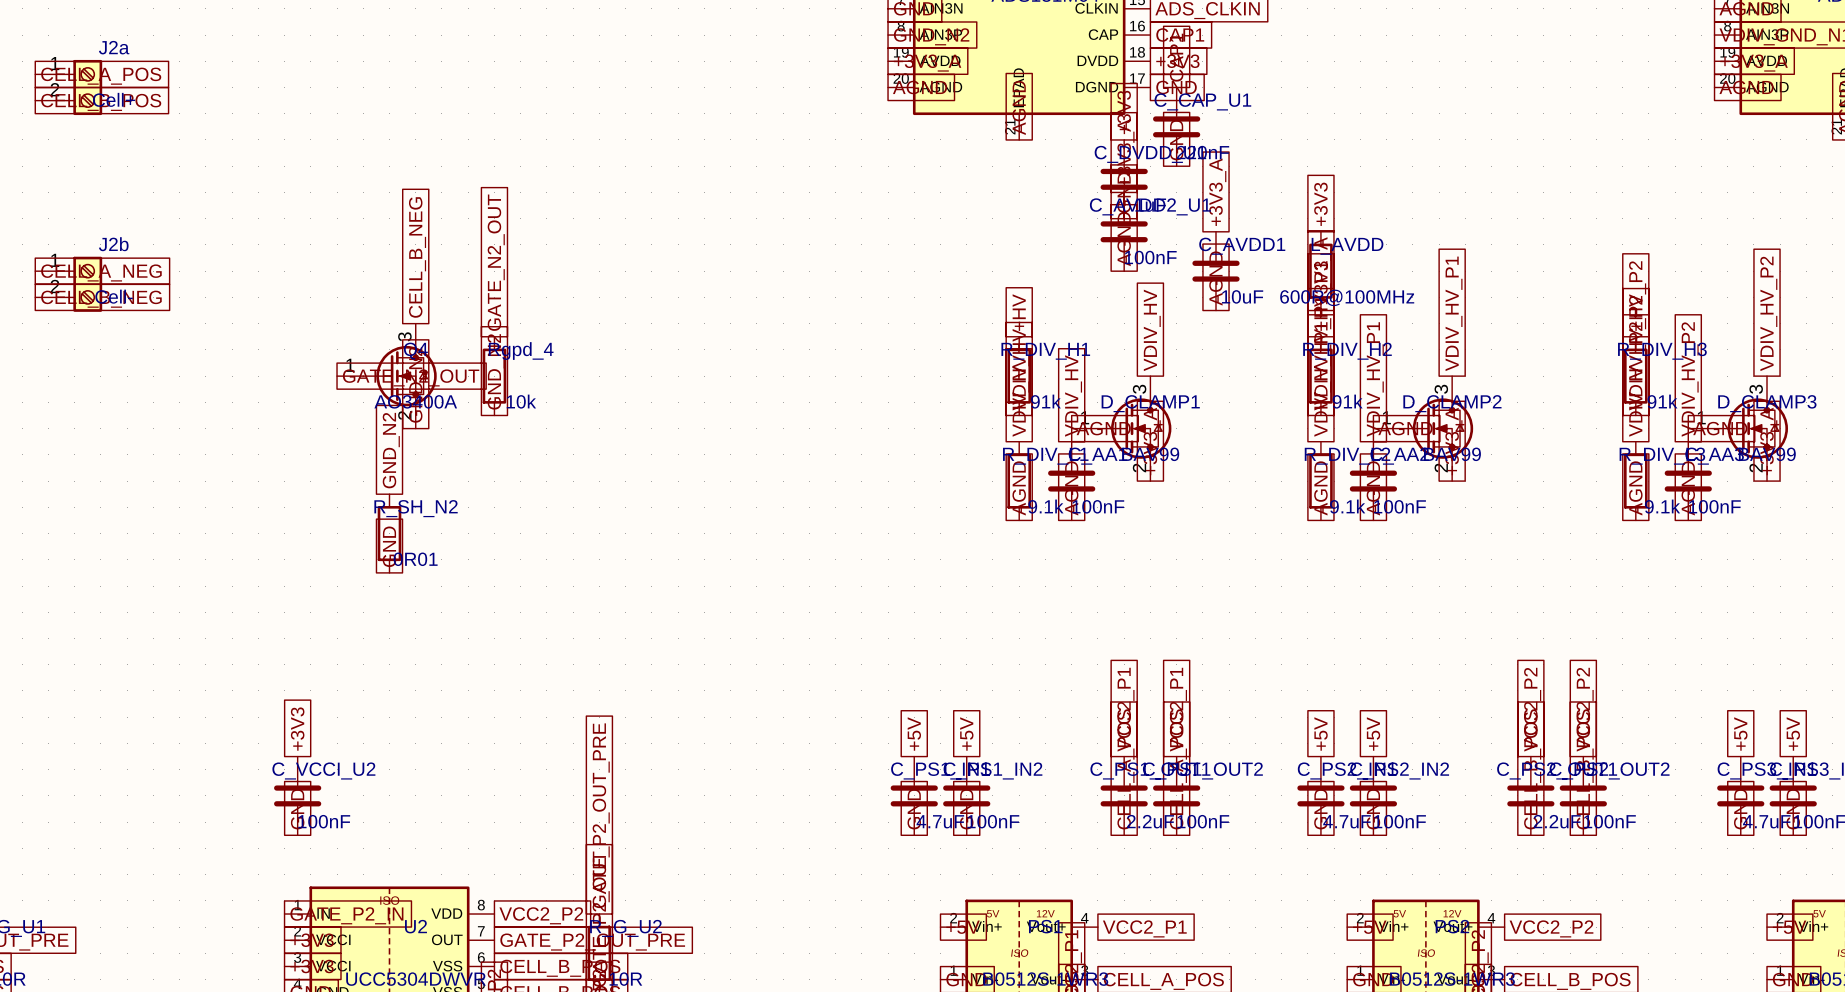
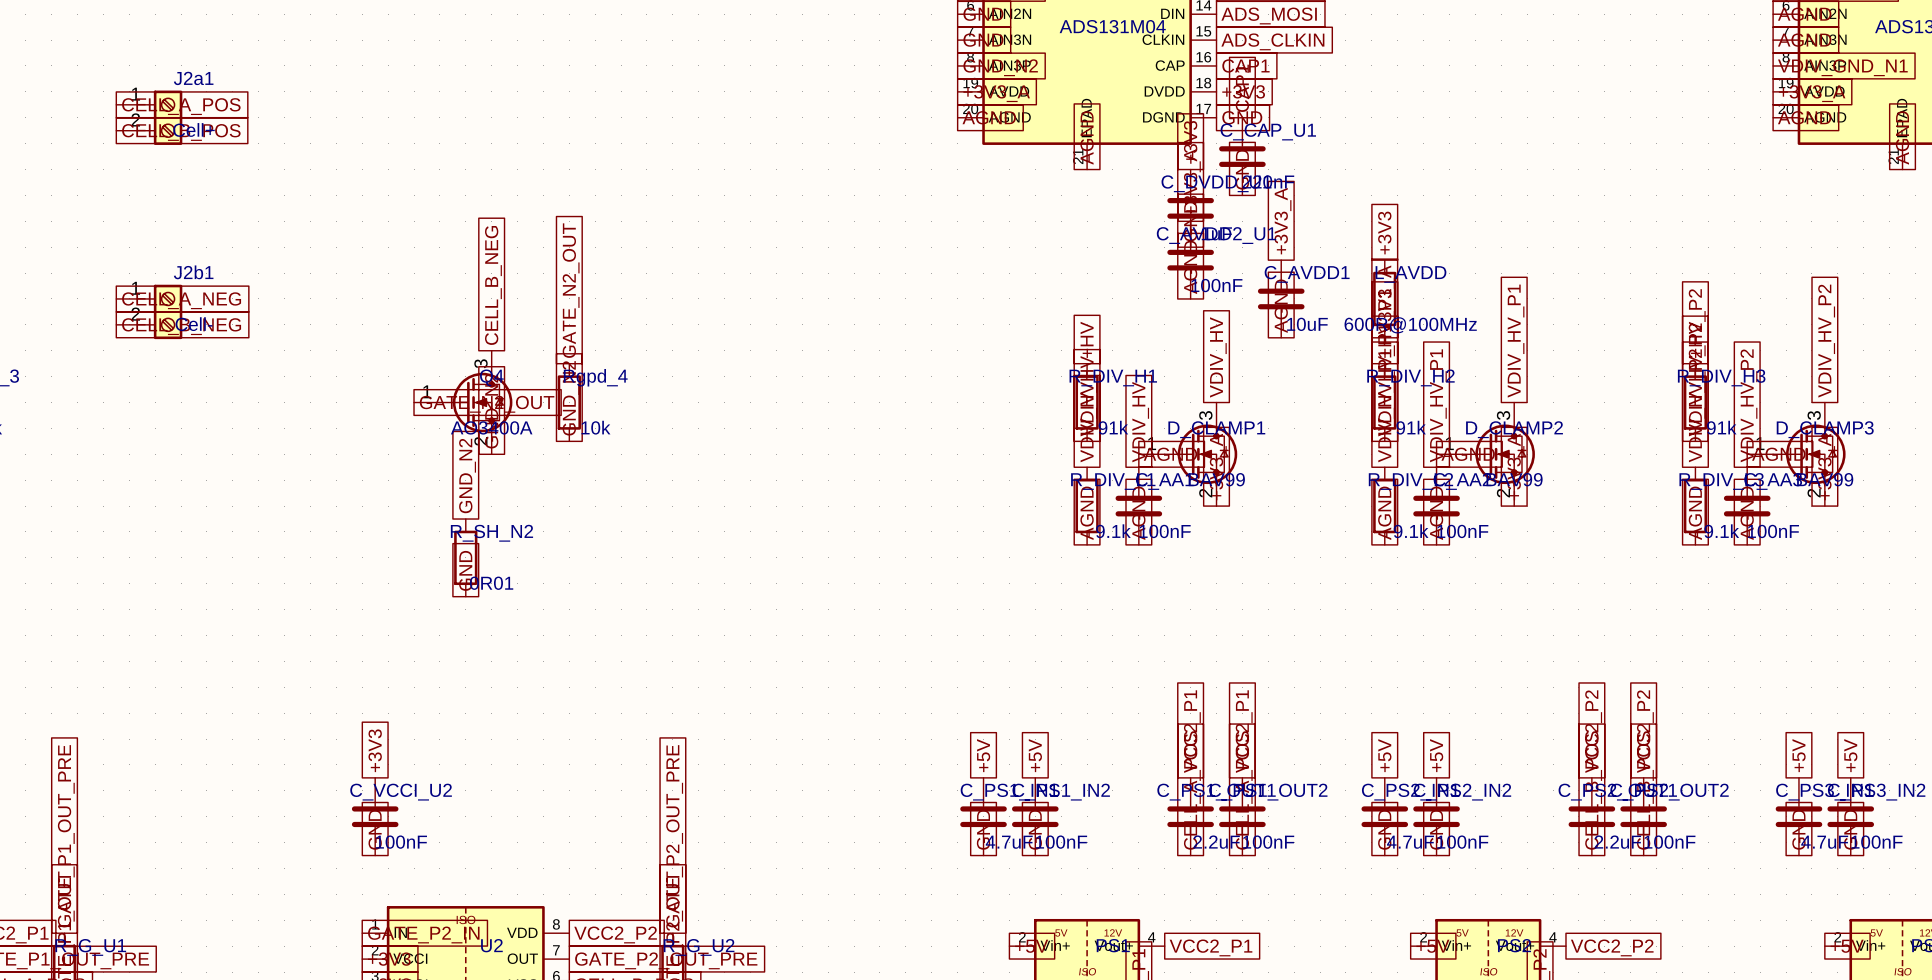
J2a name: J2a (114, 47) -> J2a1 (193, 78)
J2b name: J2b (113, 244) -> J2b1 (193, 272)

